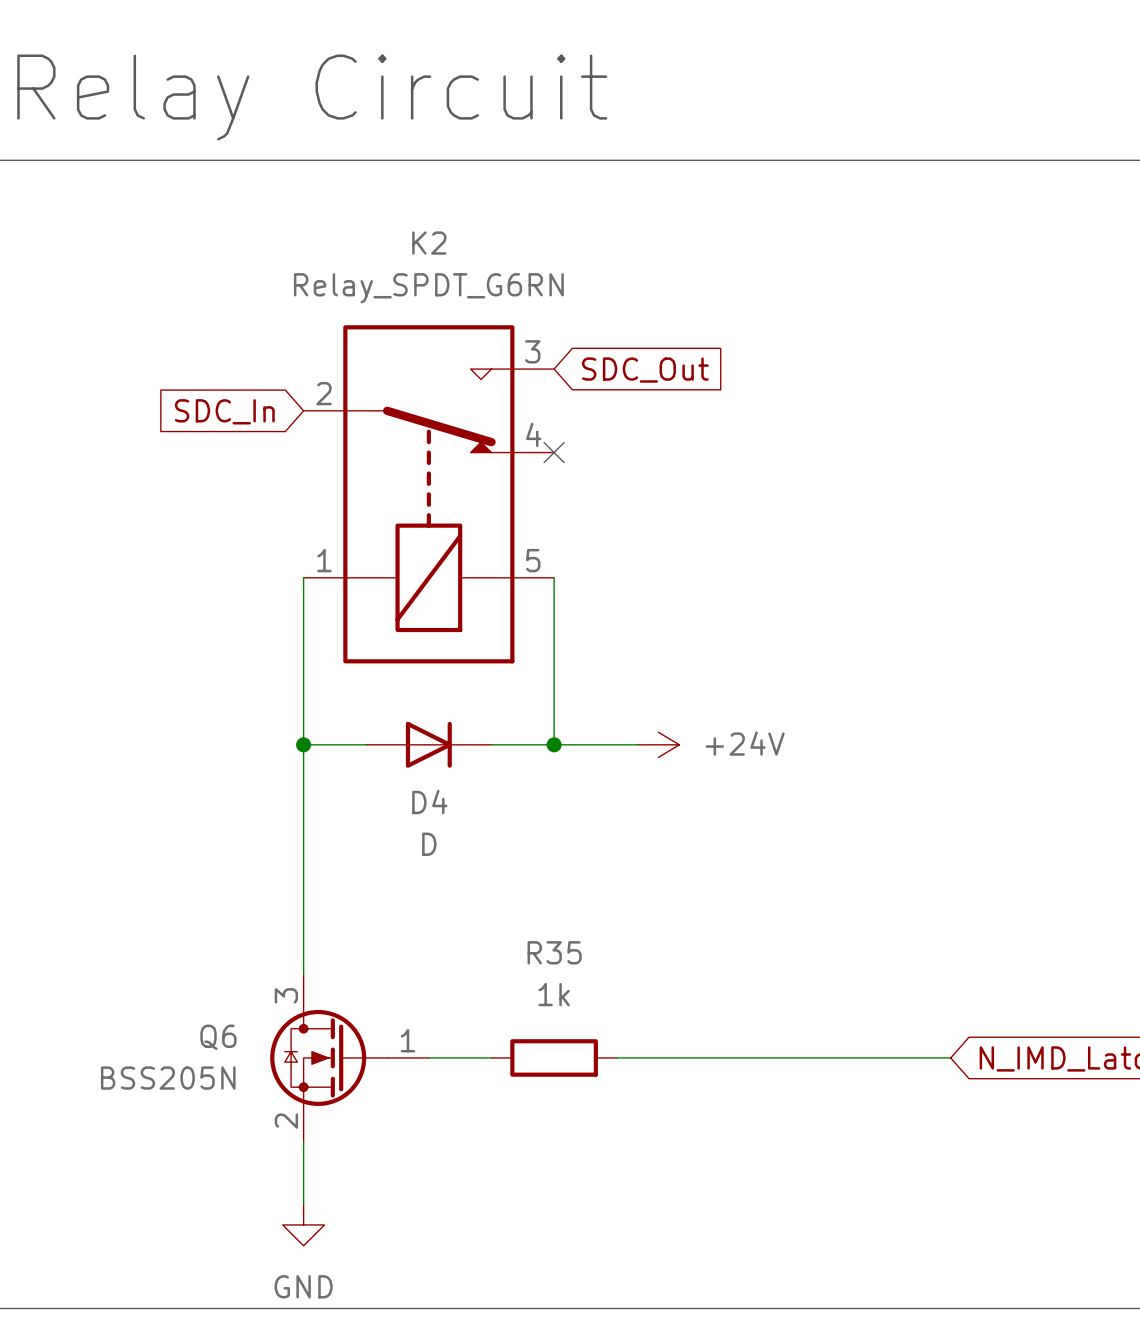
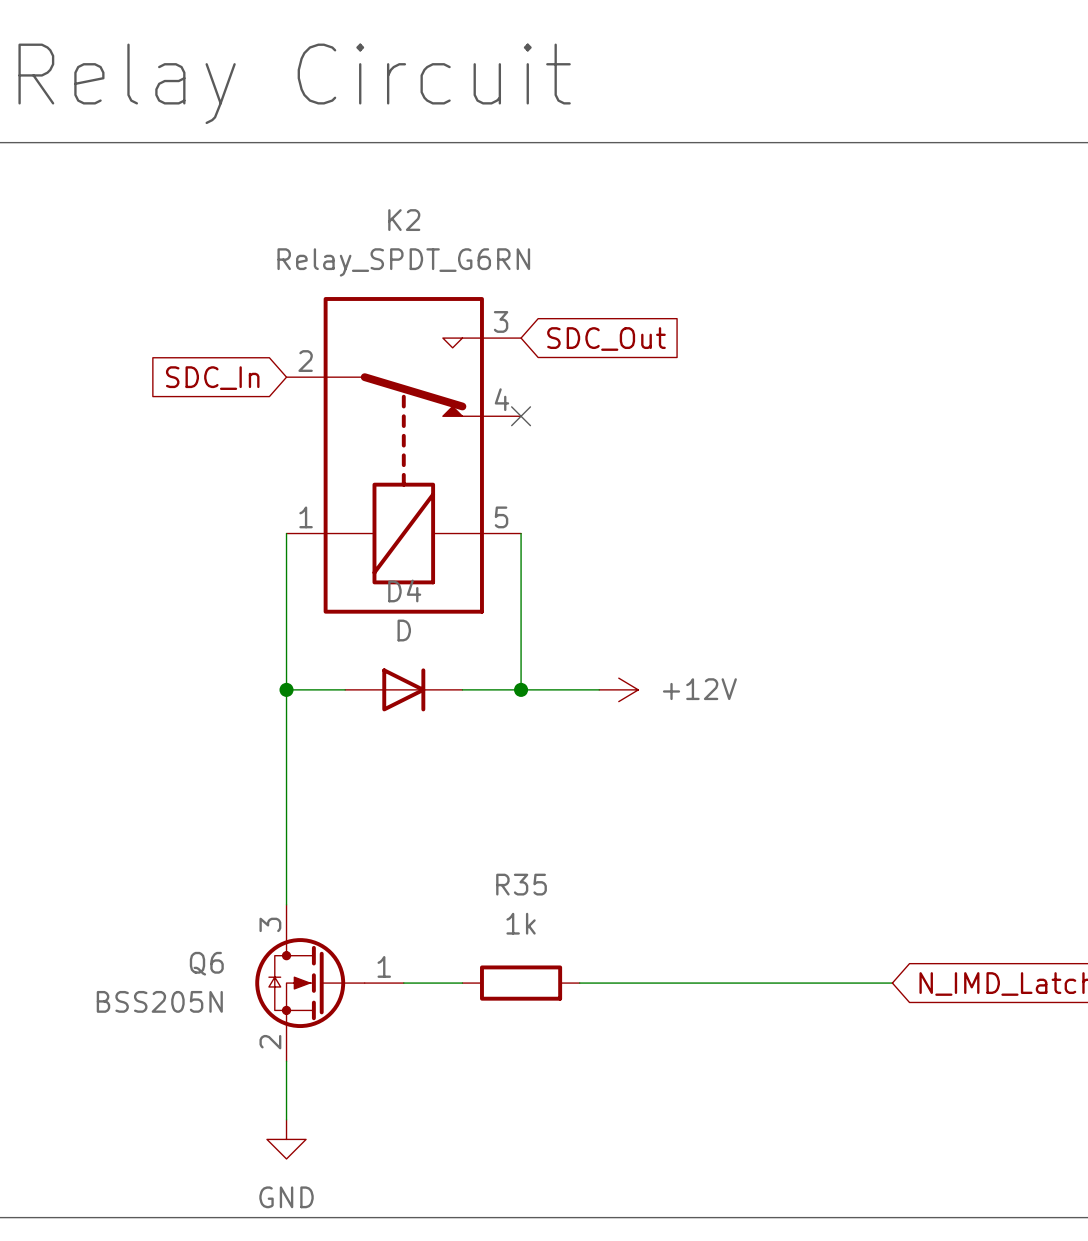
power symbol: +24V (658, 744) -> +12V (618, 689)
D4 name position: D4 (429, 802) -> D4 (404, 590)
D4 value position: D (429, 844) -> D (404, 630)

